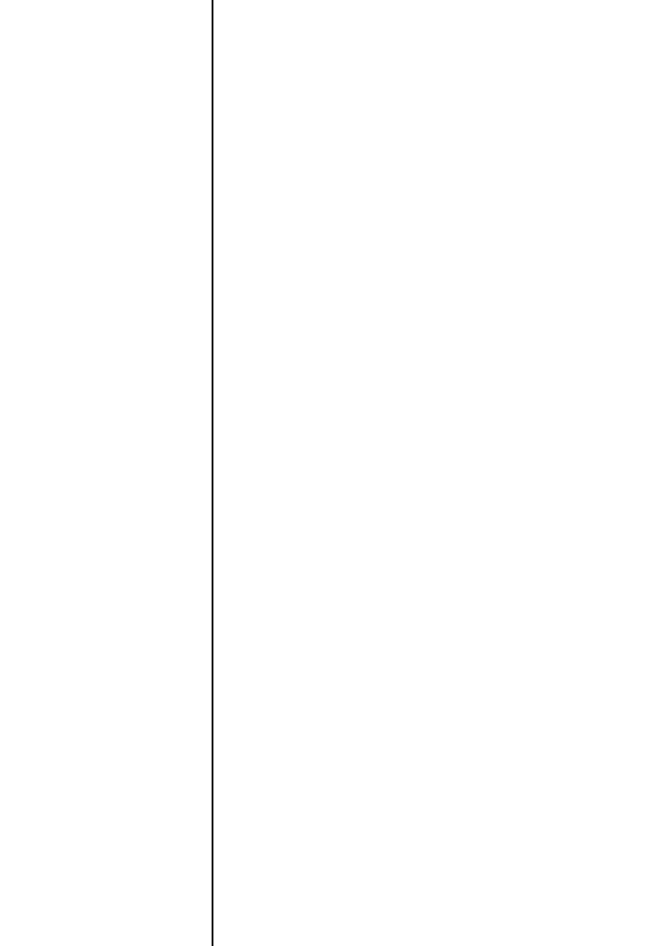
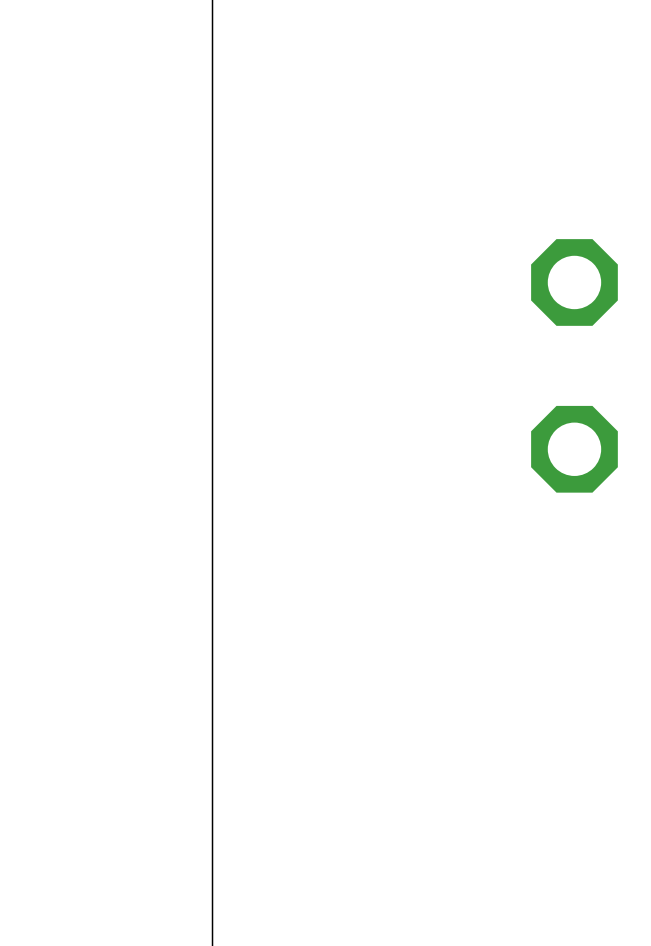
part: none -> (574, 365)

